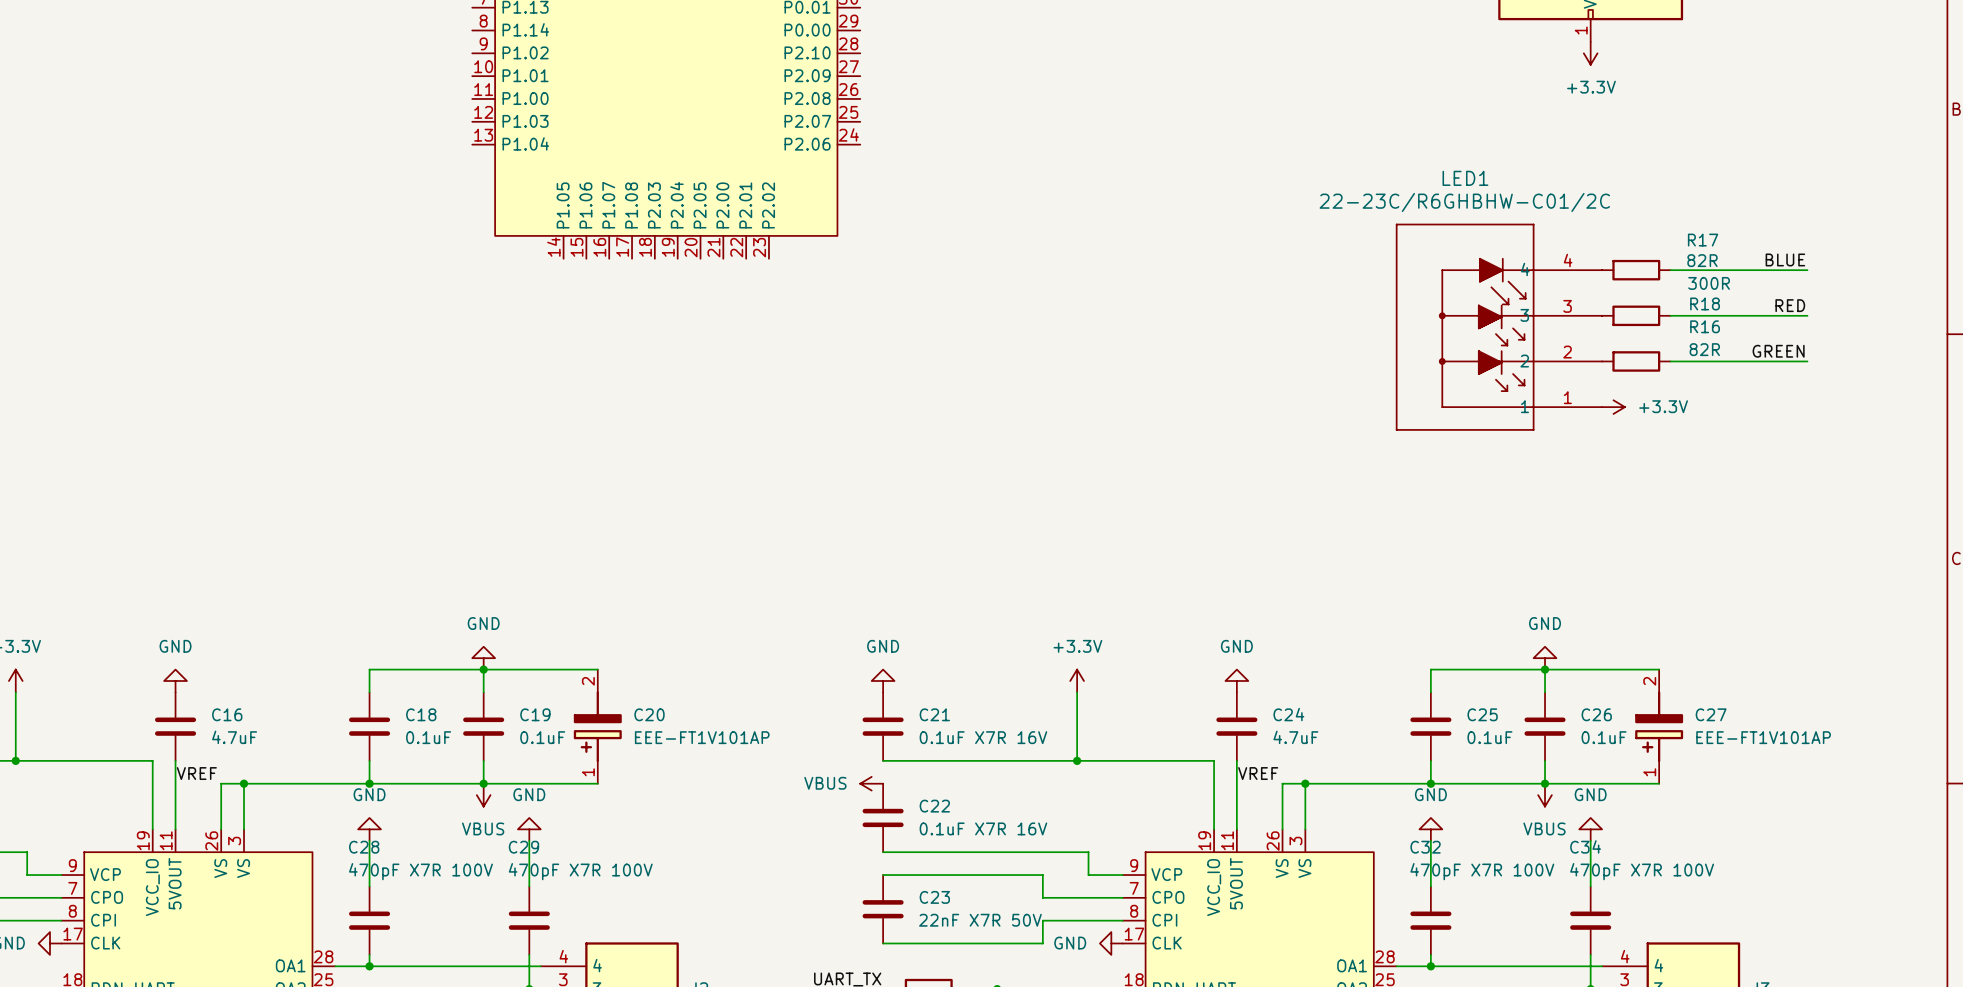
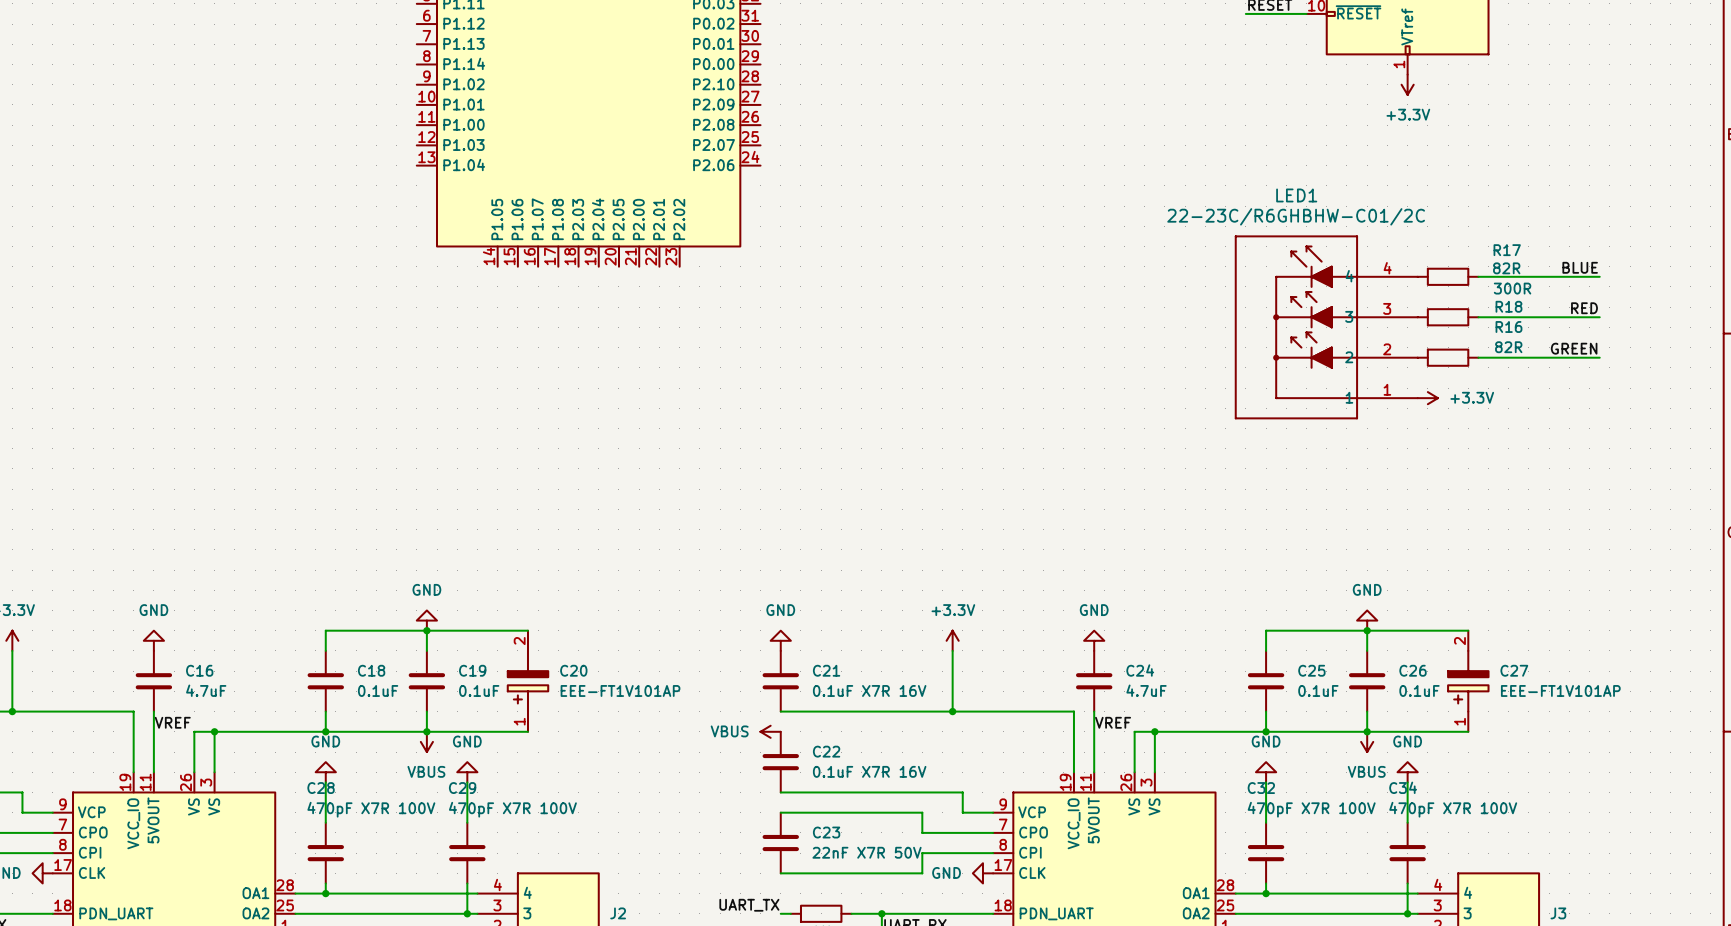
LED1 symbol: [1396, 223, 1603, 431] -> [1235, 235, 1418, 419]

